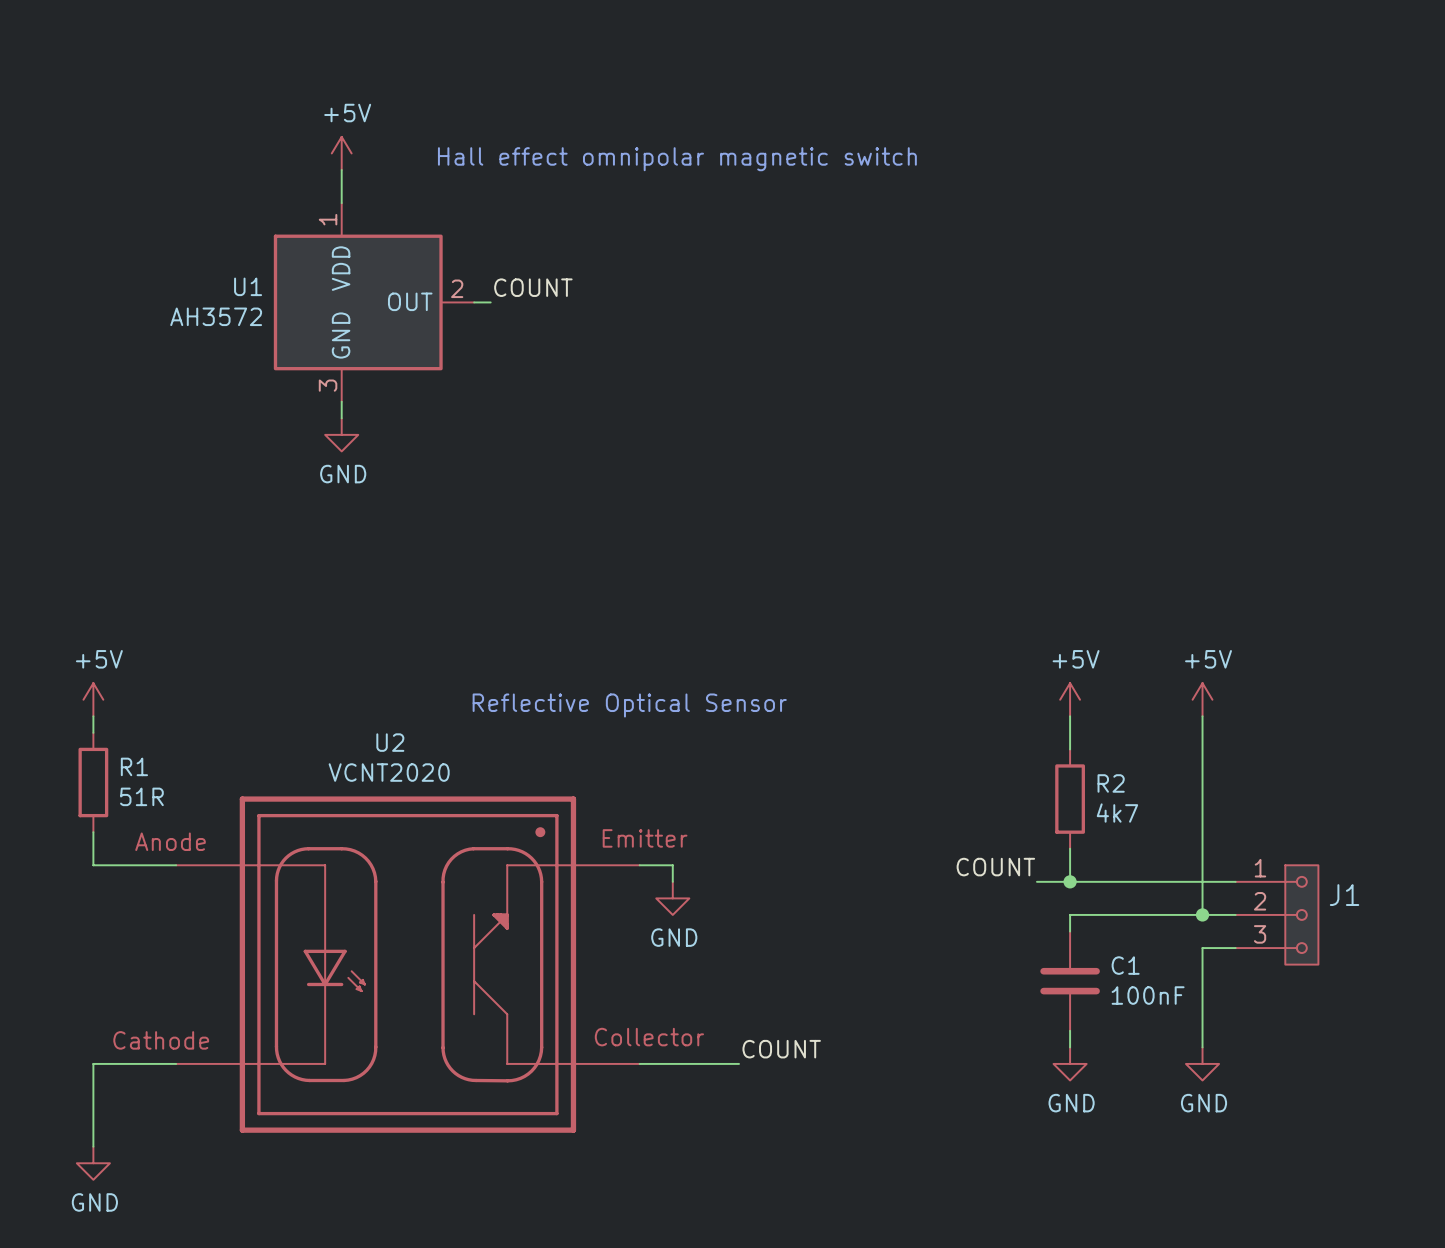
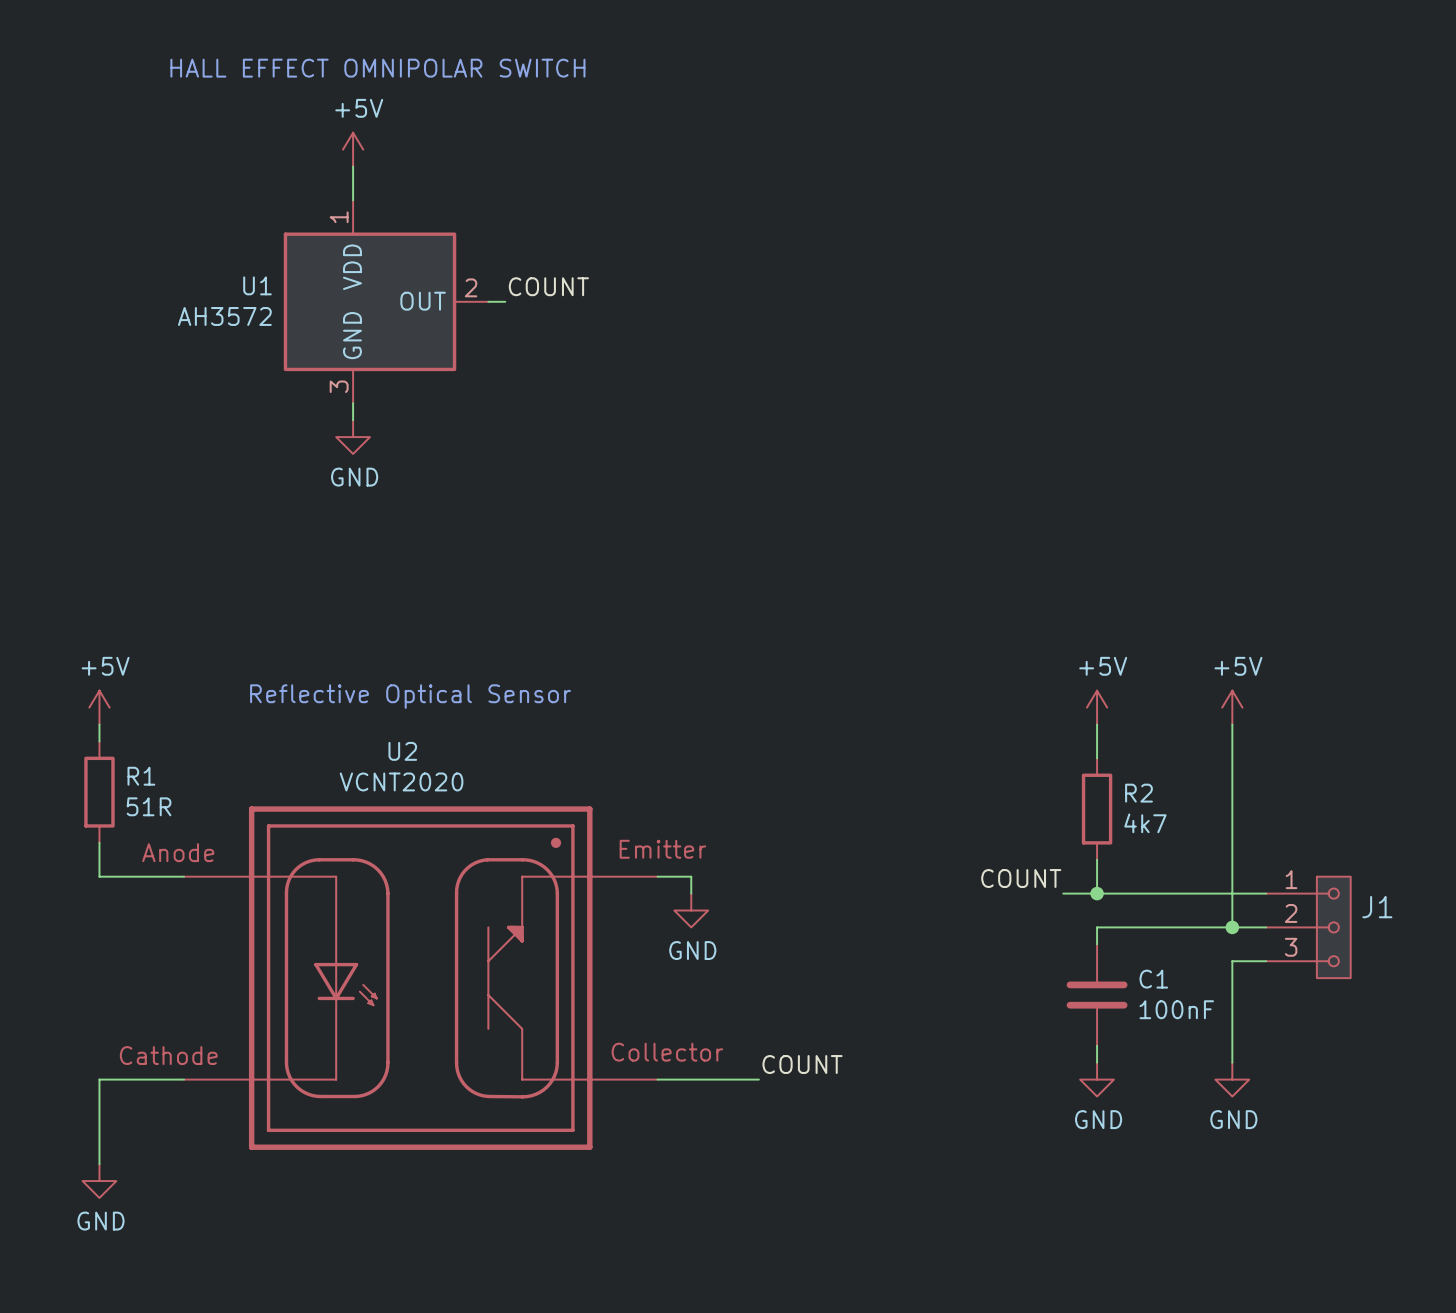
text: none -> HALL EFFECT OMNIPOLAR SWITCH (377, 68)
text: Hall effect omnipolar magnetic switch (677, 159) -> none
text position: Reflective Optical Sensor (629, 705) -> Reflective Optical Sensor (410, 696)

